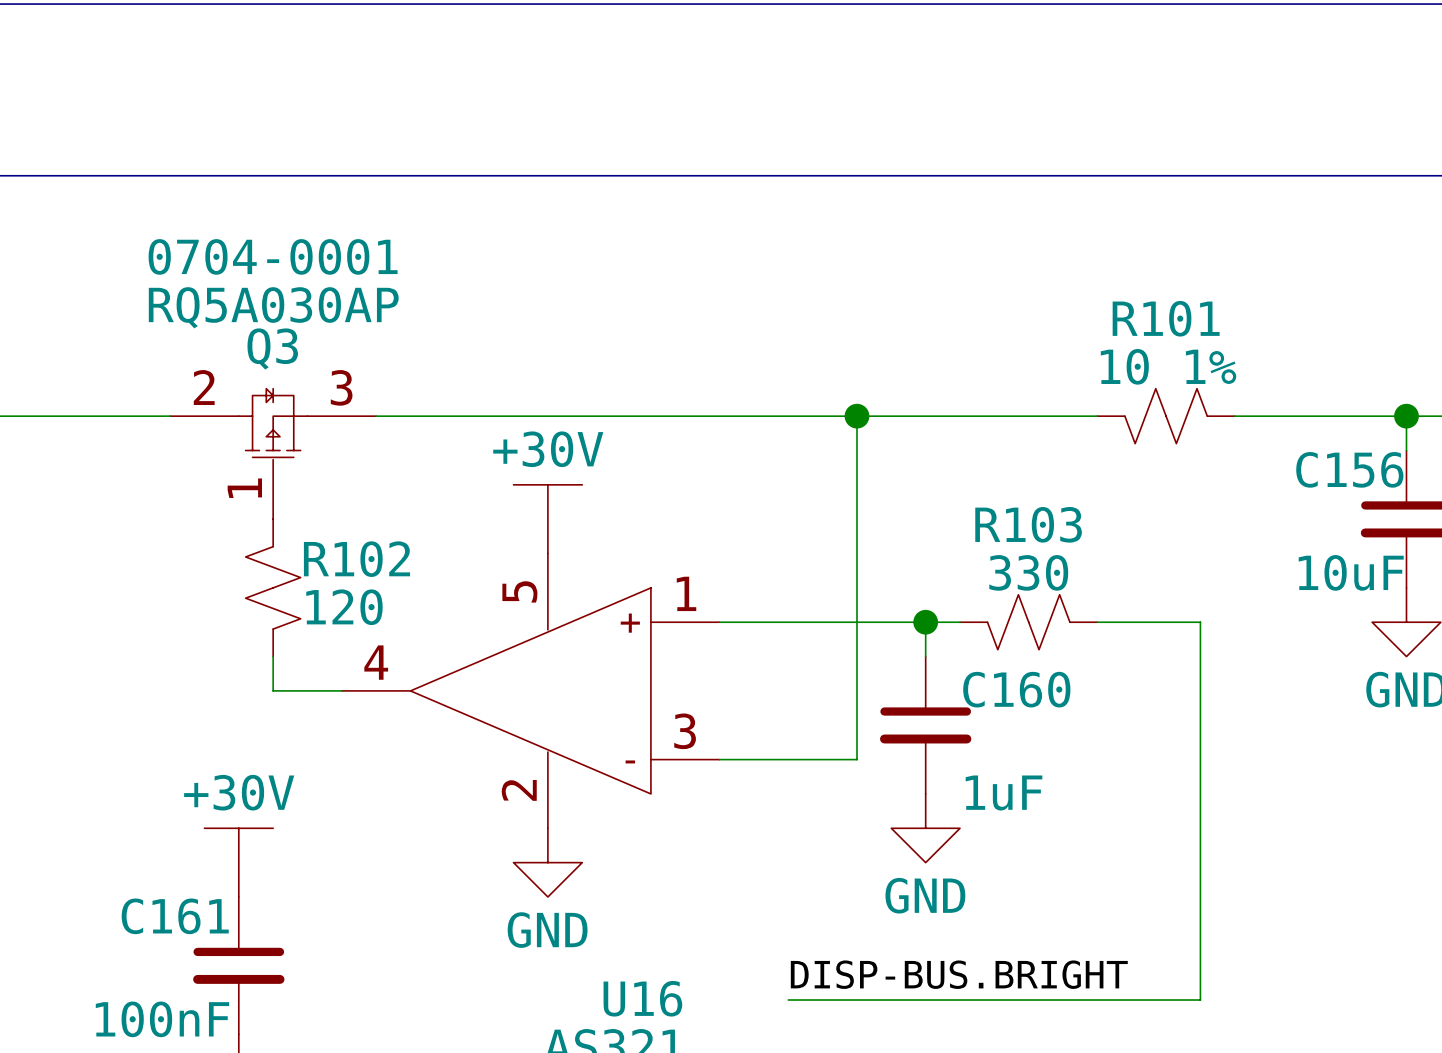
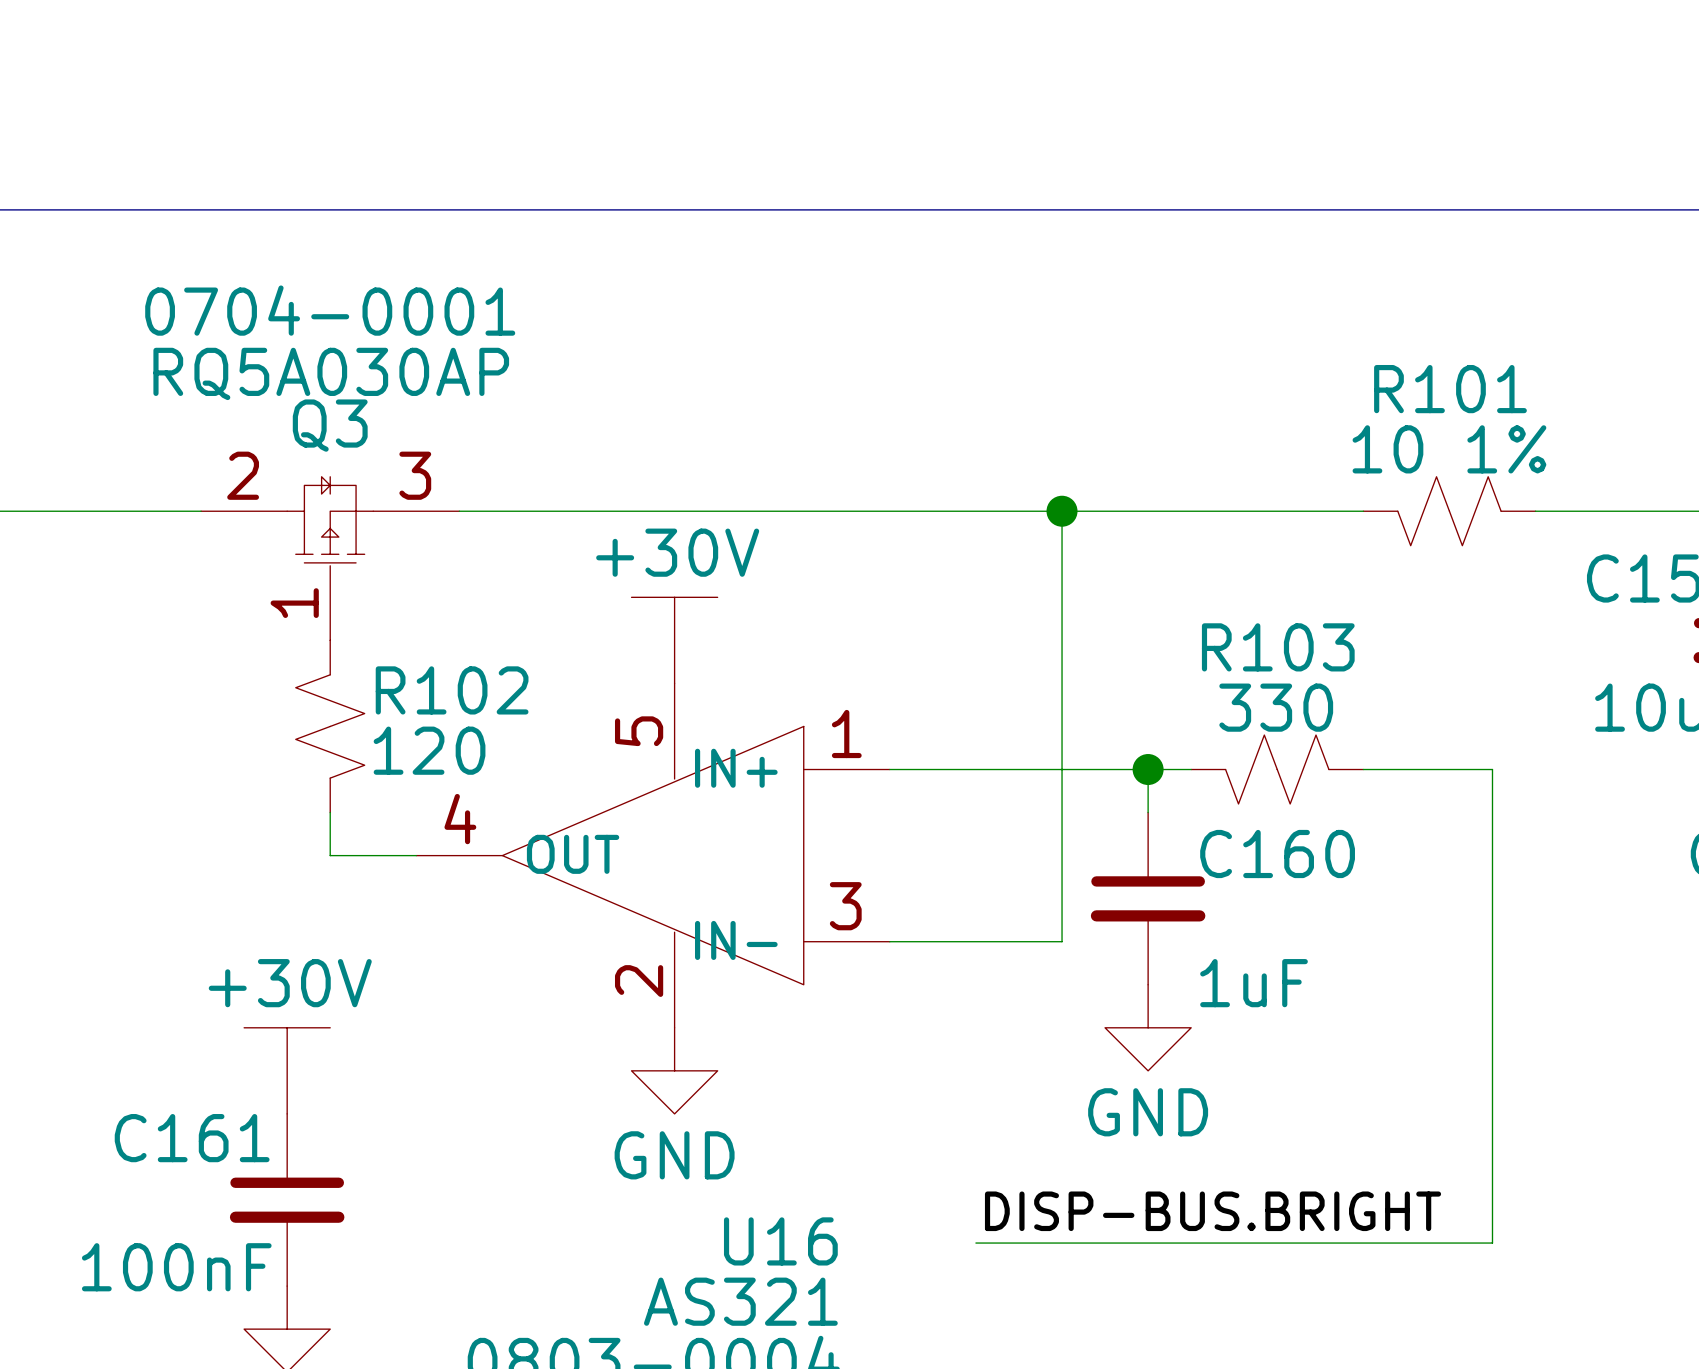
U16 pin name: none -> IN+ (736, 768)
U16 text: + (630, 623) -> none
U16 pin name: none -> OUT (573, 854)
U16 pin name: none -> IN- (736, 940)
U16 text: - (630, 761) -> none

